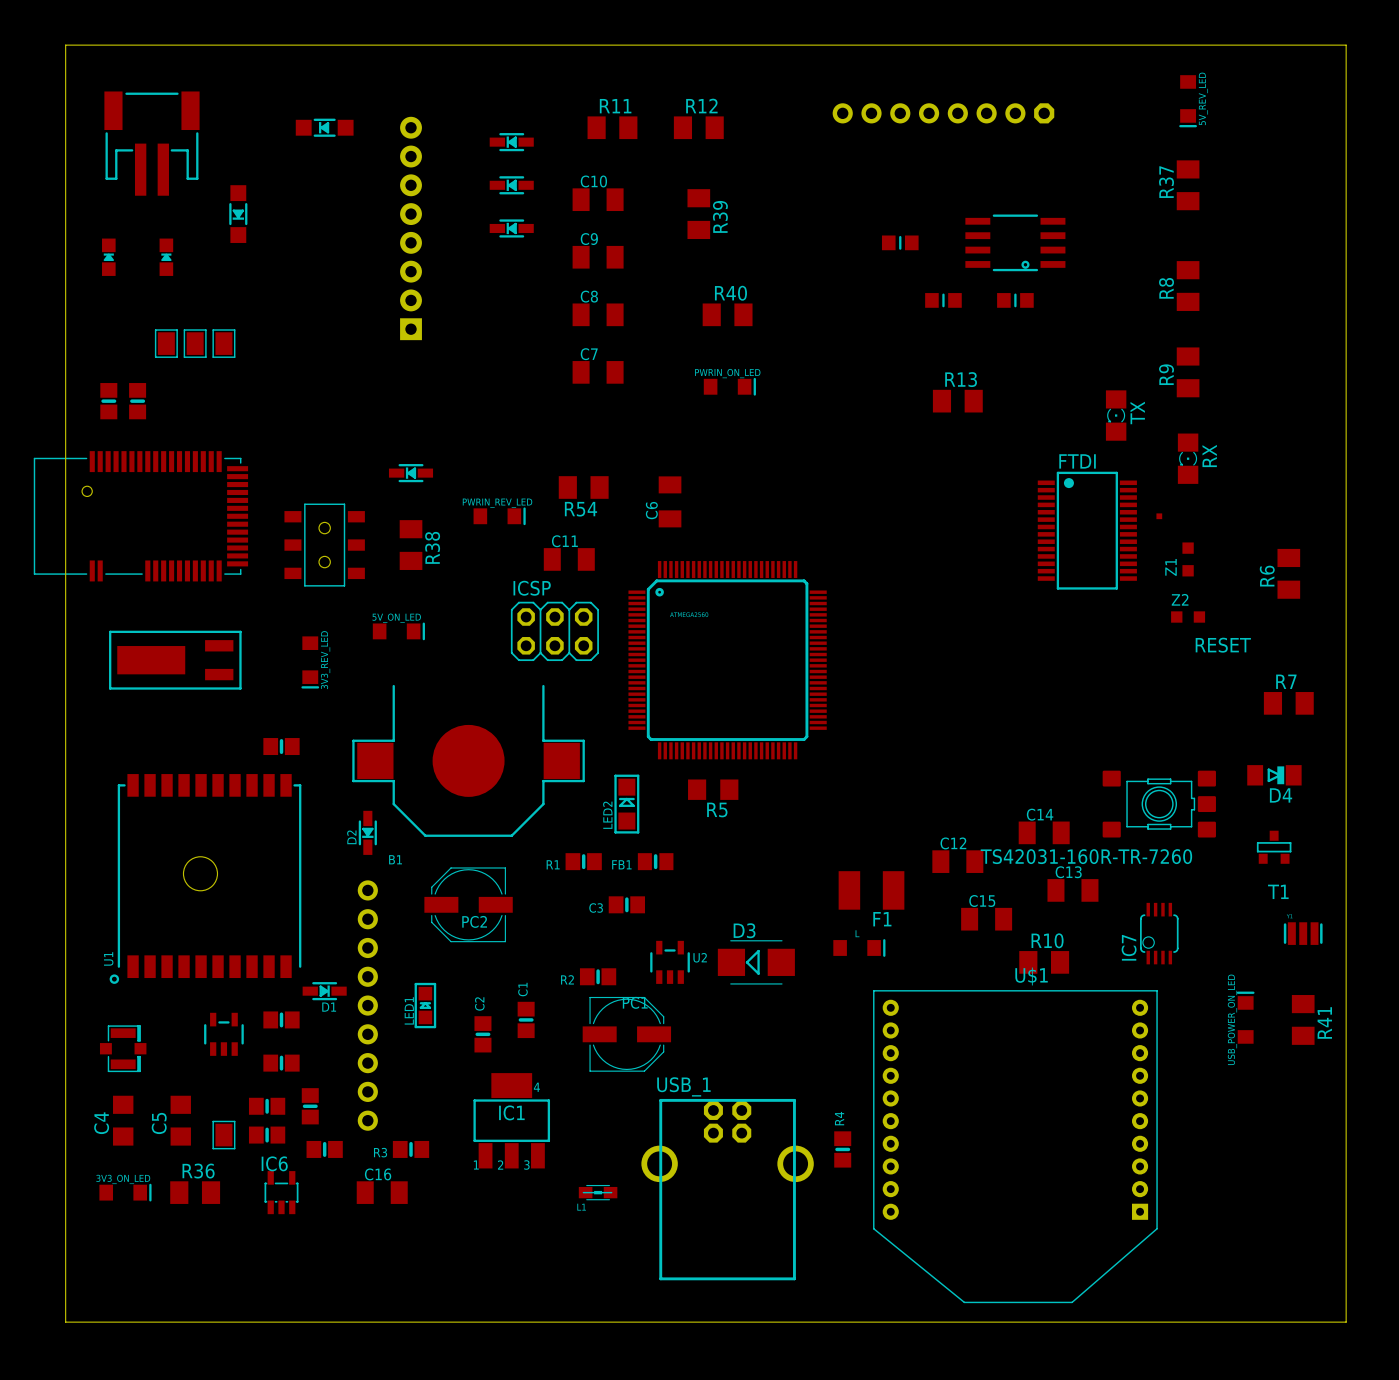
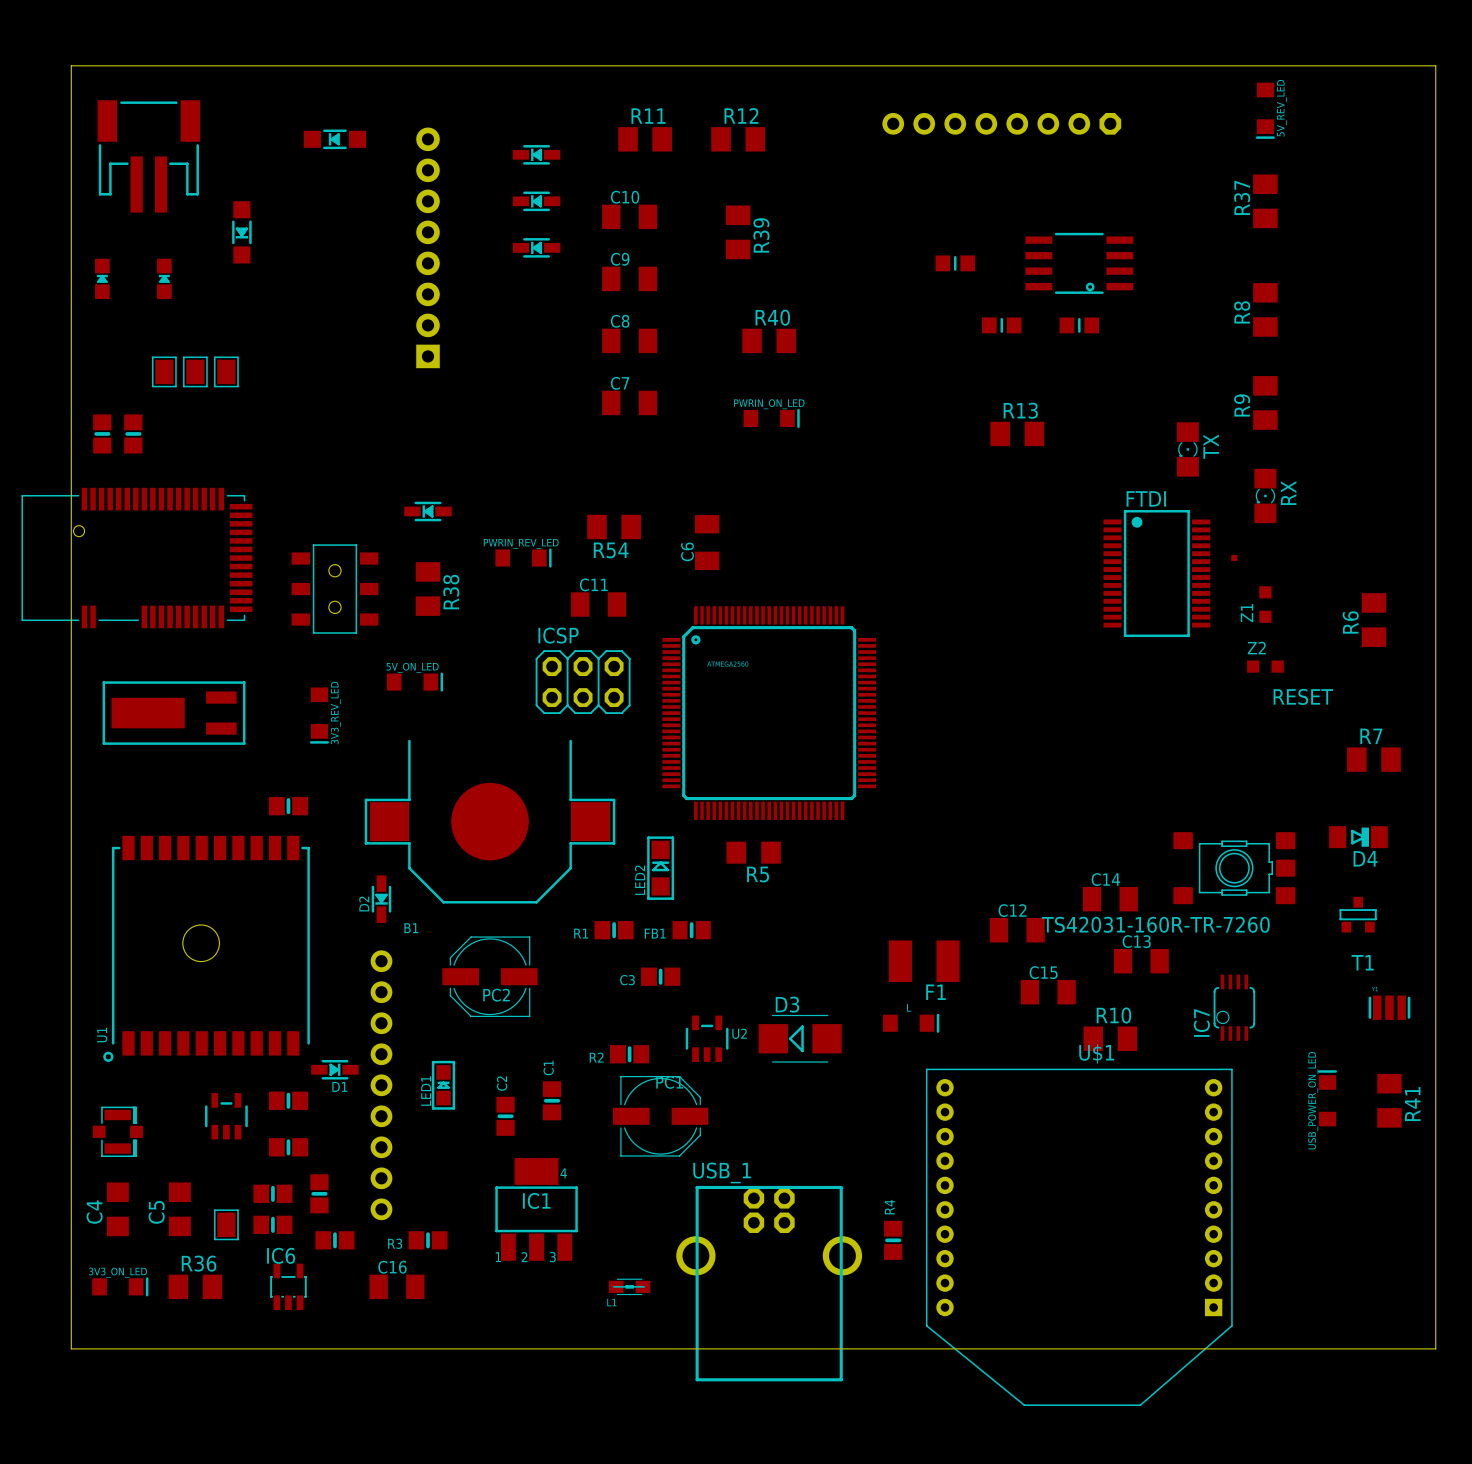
board edge: (1346, 59) (1346, 45) (65, 45) (65, 1322) (1346, 1322) (1346, 1250) -> (1435, 65) (71, 65) (71, 1348) (1435, 1348)

